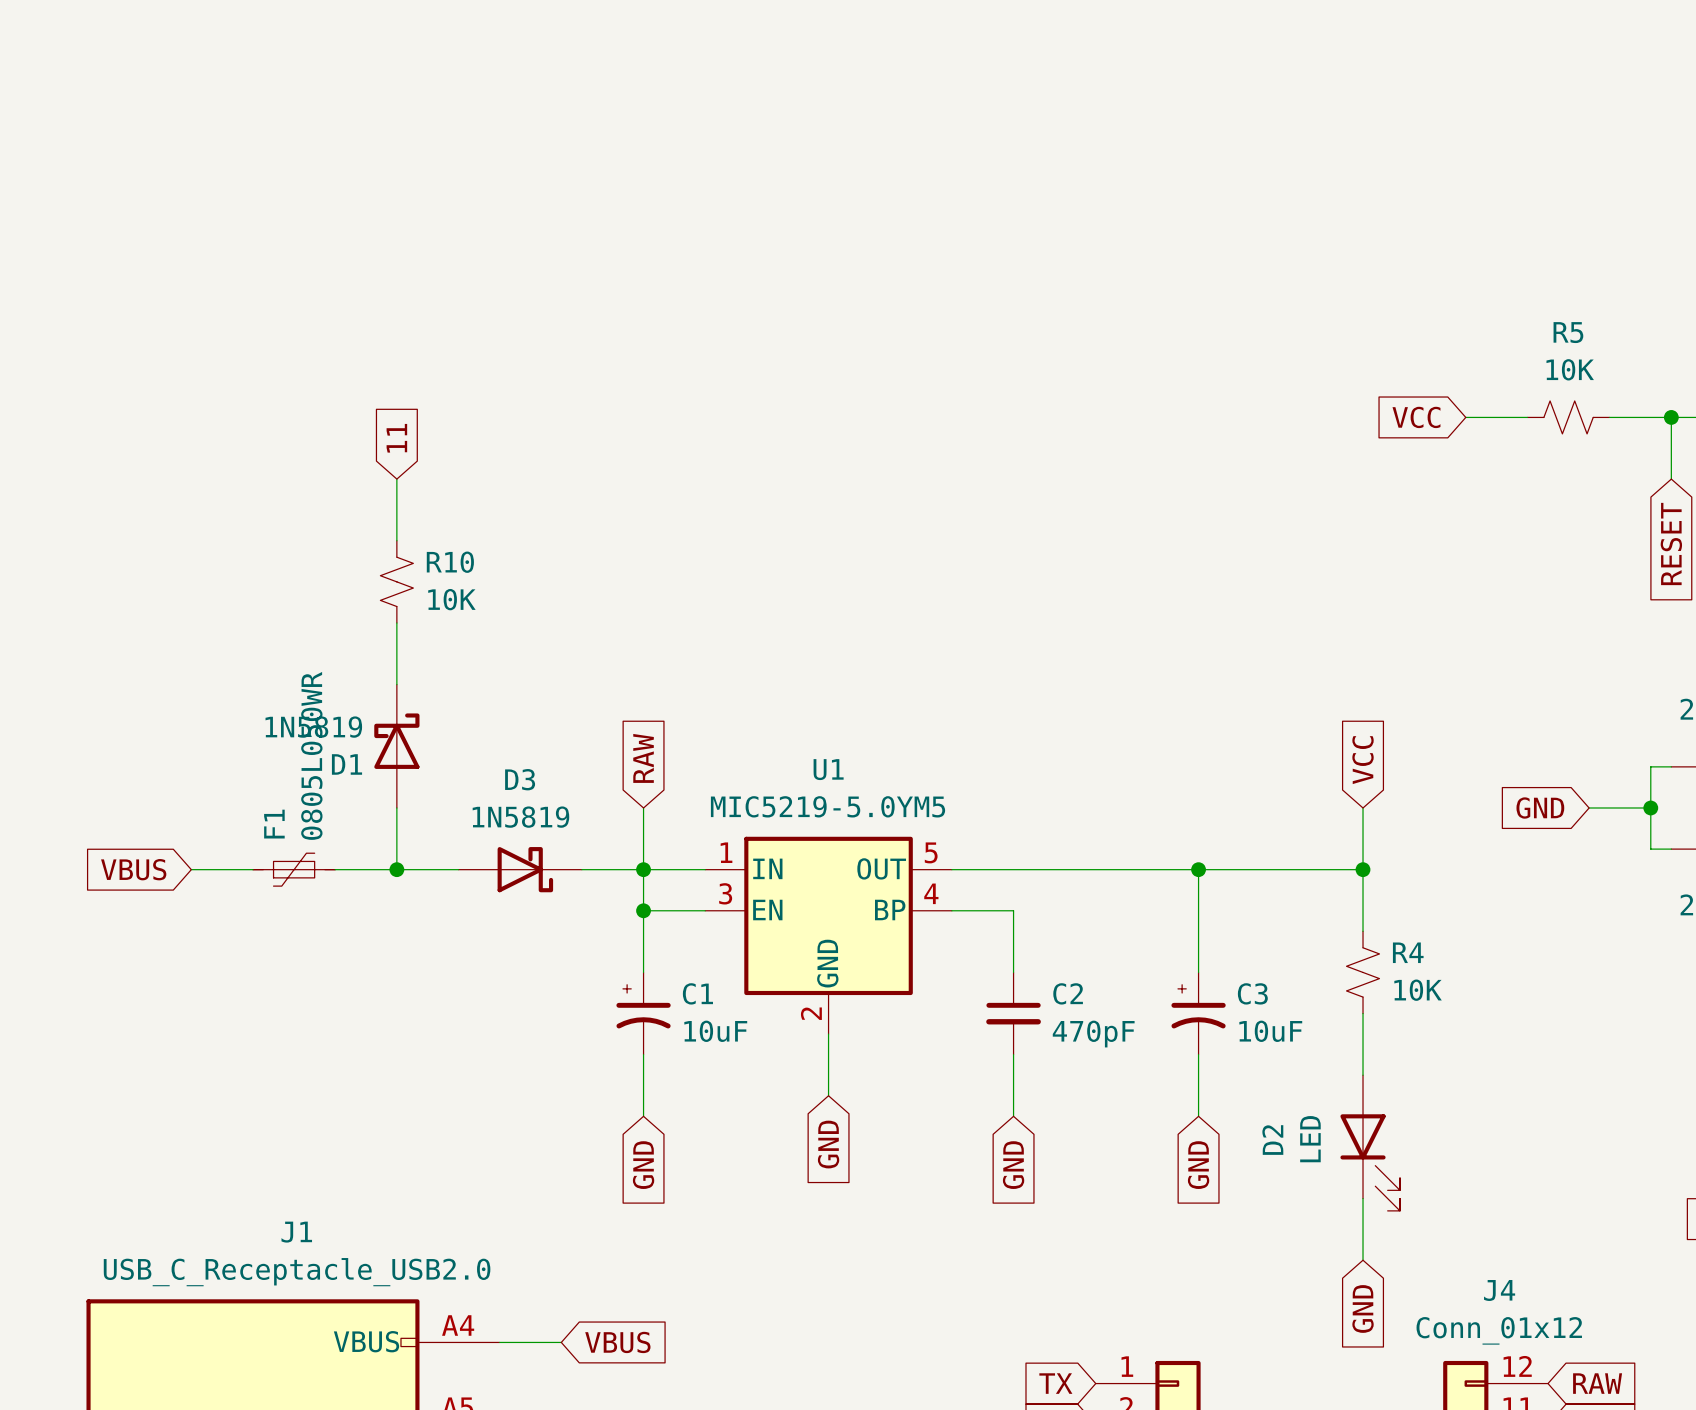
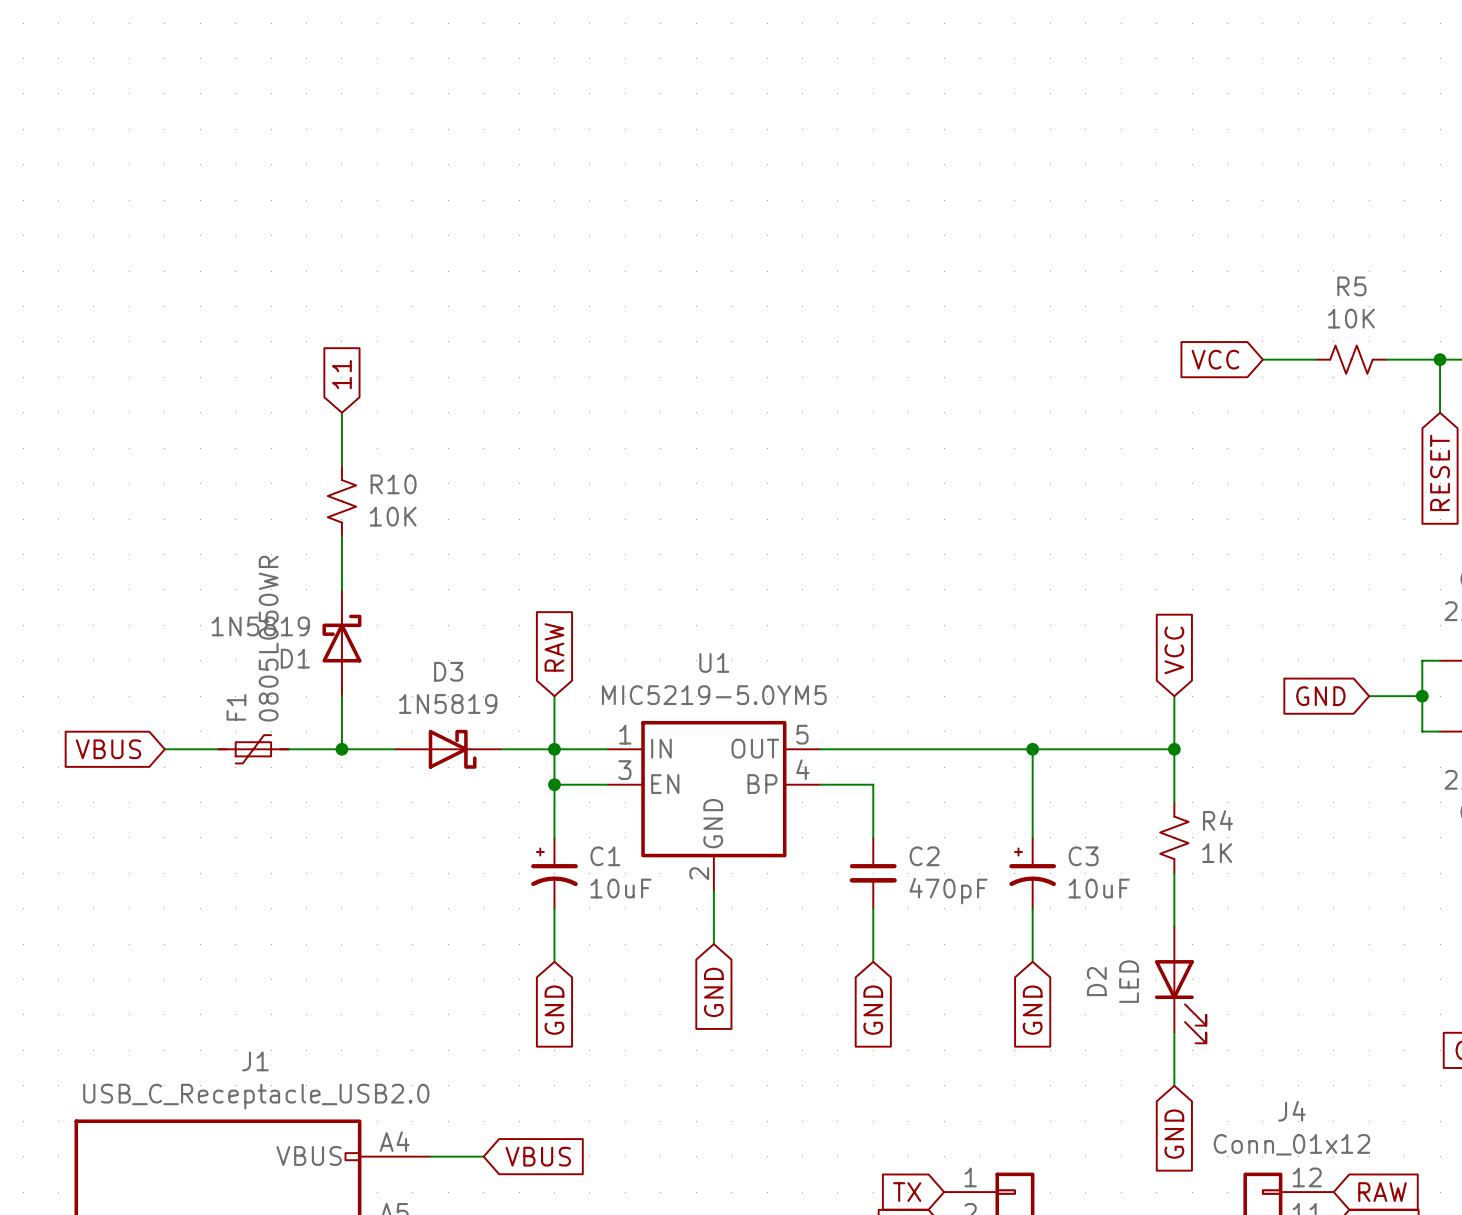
R4 value: 10K (1418, 990) -> 1K (1217, 853)

